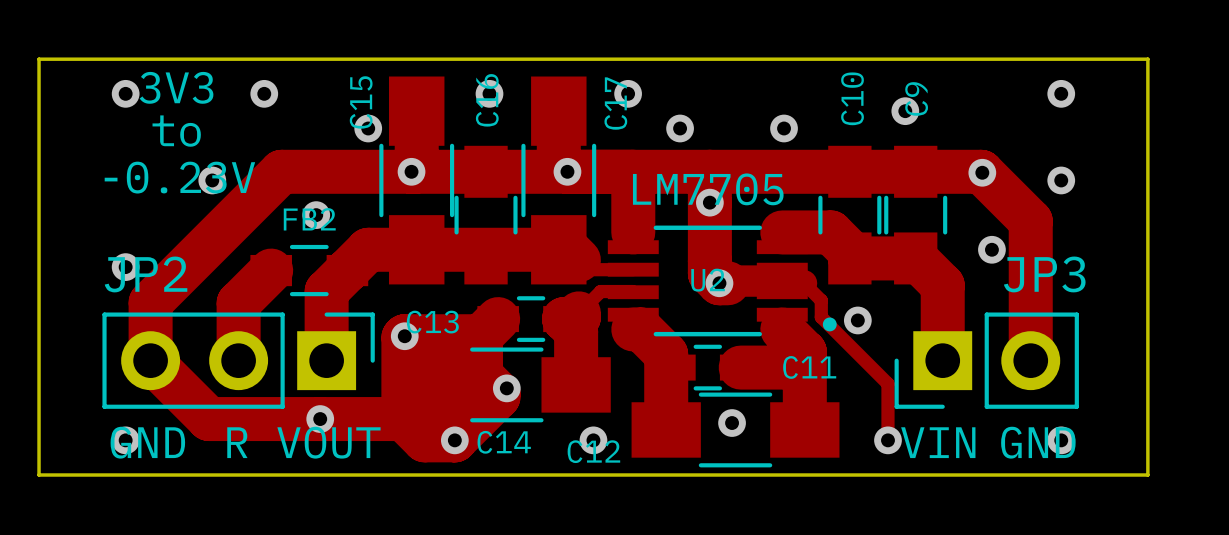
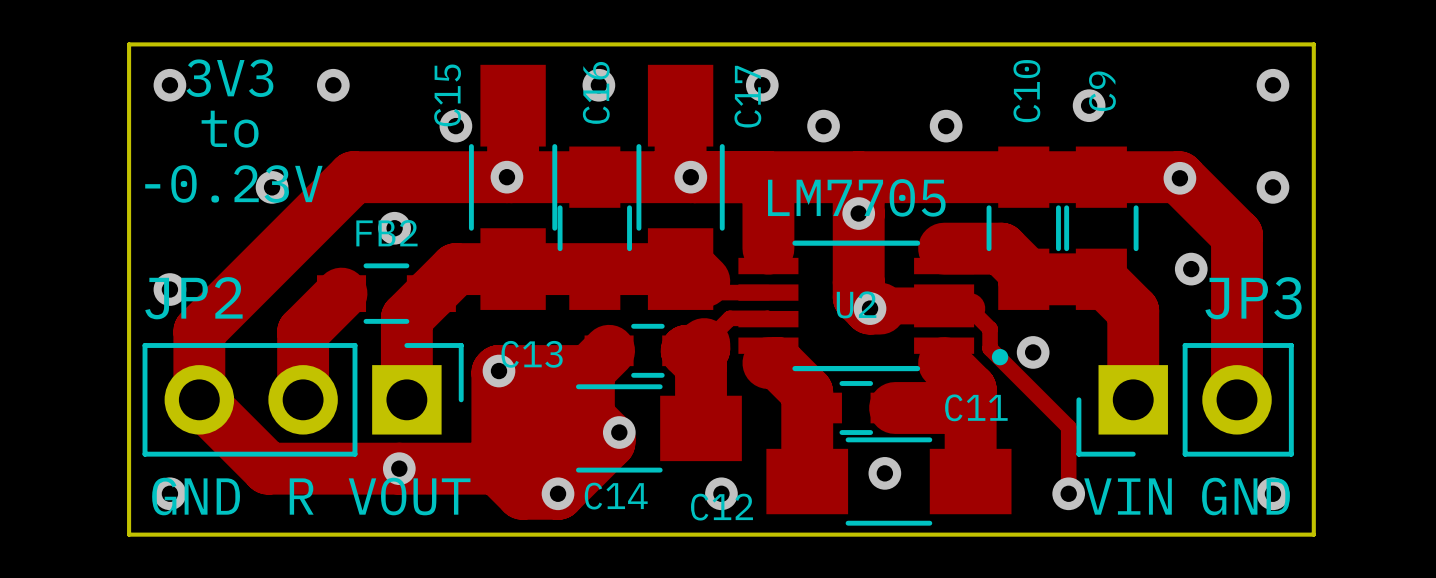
board edge: (91, 59) (39, 59) (39, 475) (91, 475) -> (129, 44) (129, 534)
board edge: (1095, 59) (1147, 59) (1147, 475) (1095, 475) -> (1313, 44) (1313, 534)

